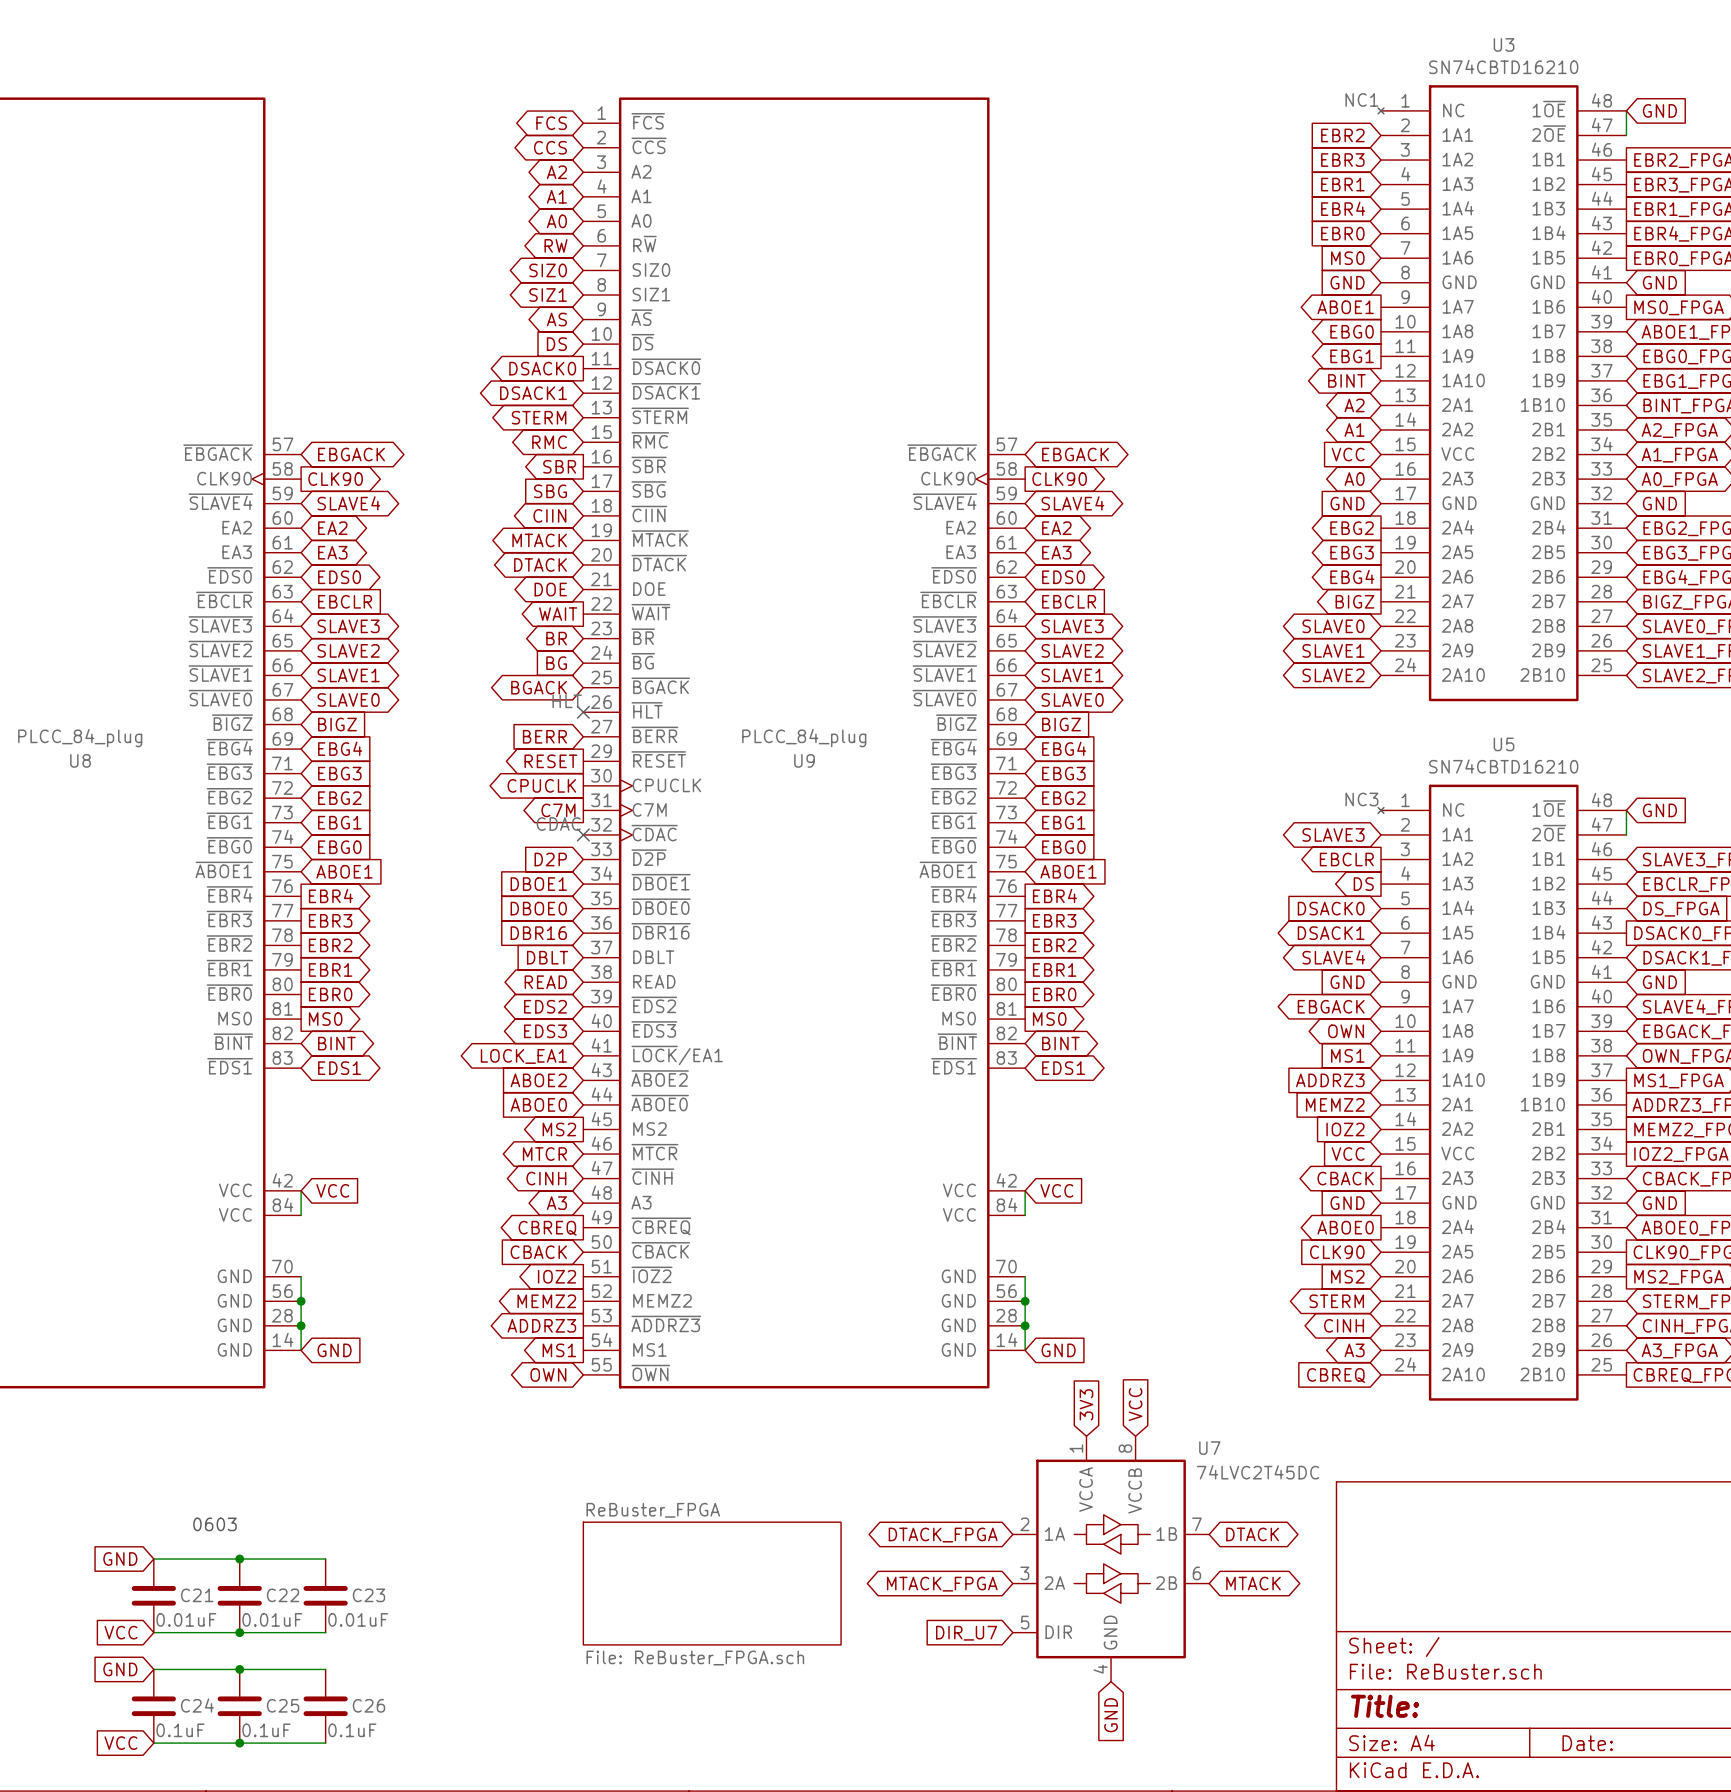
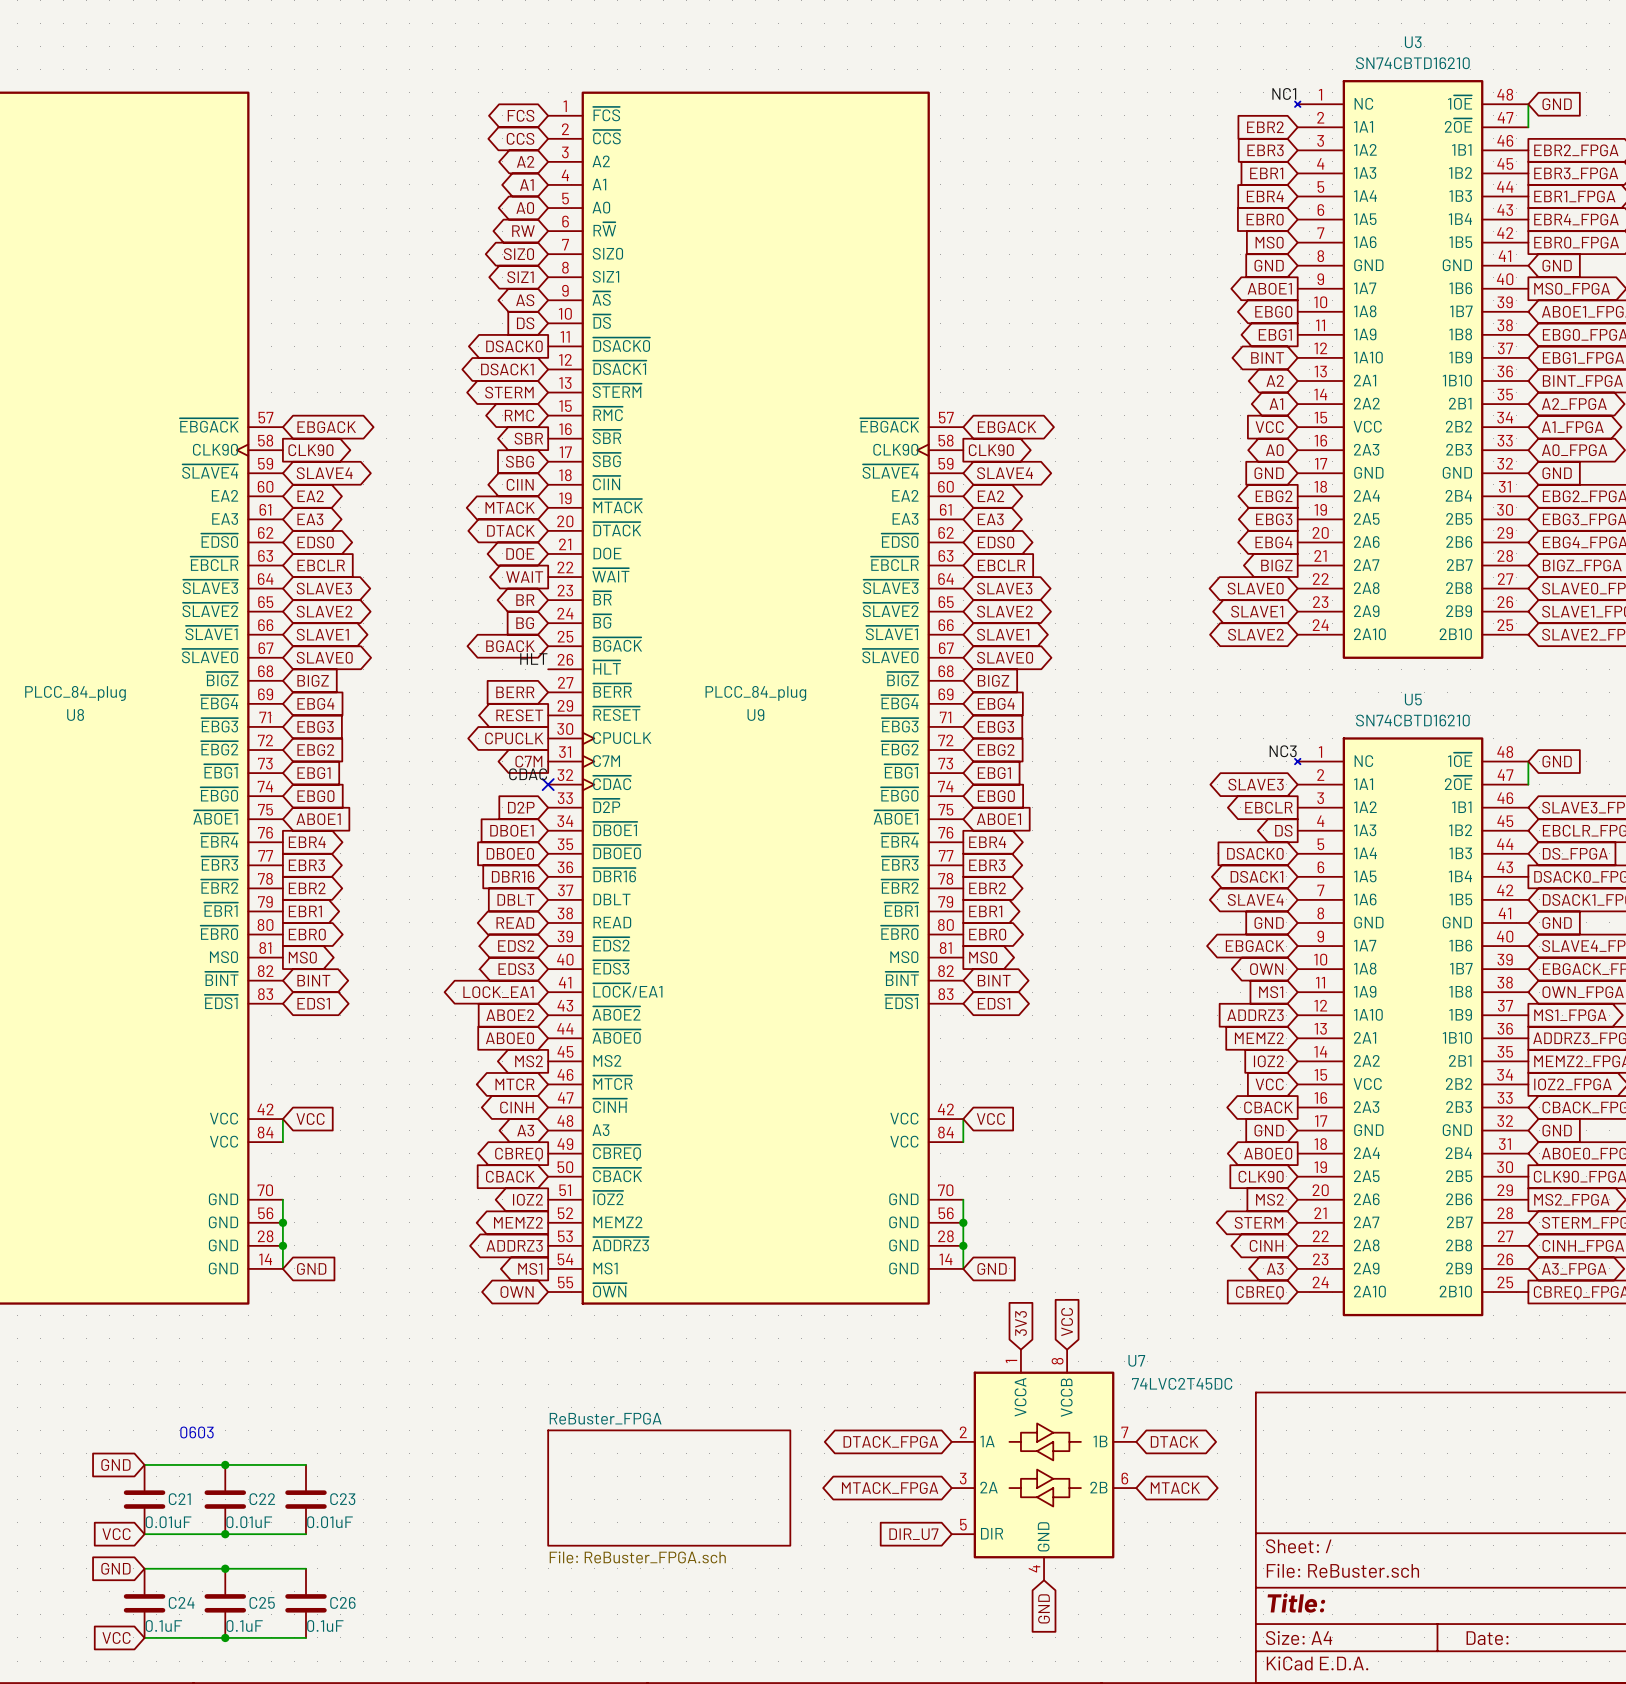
no-connect mark: (583, 712) -> none

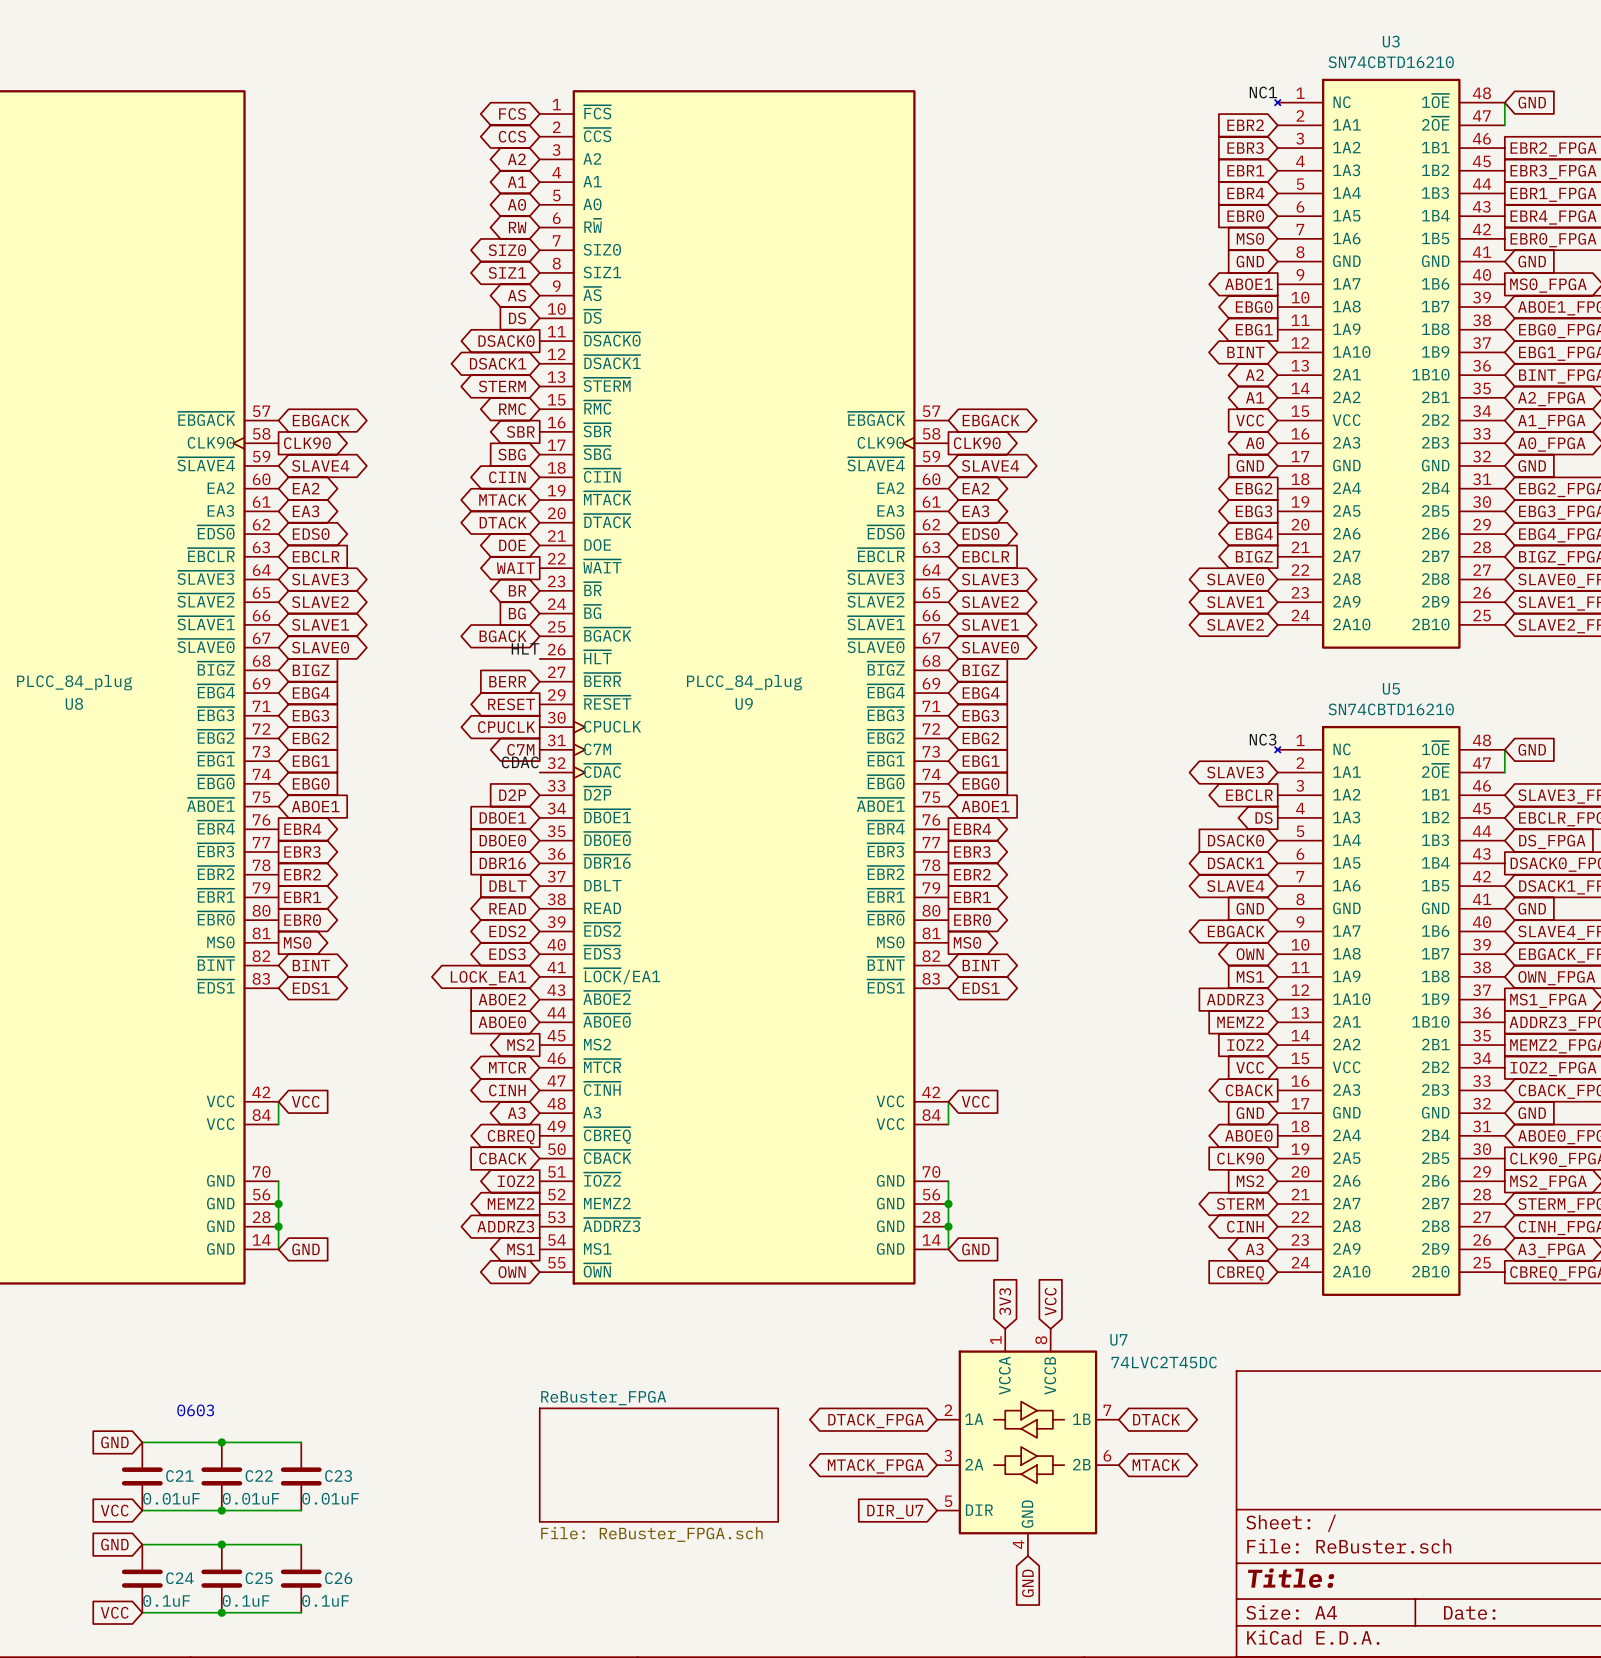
no-connect mark: (548, 784) -> none

